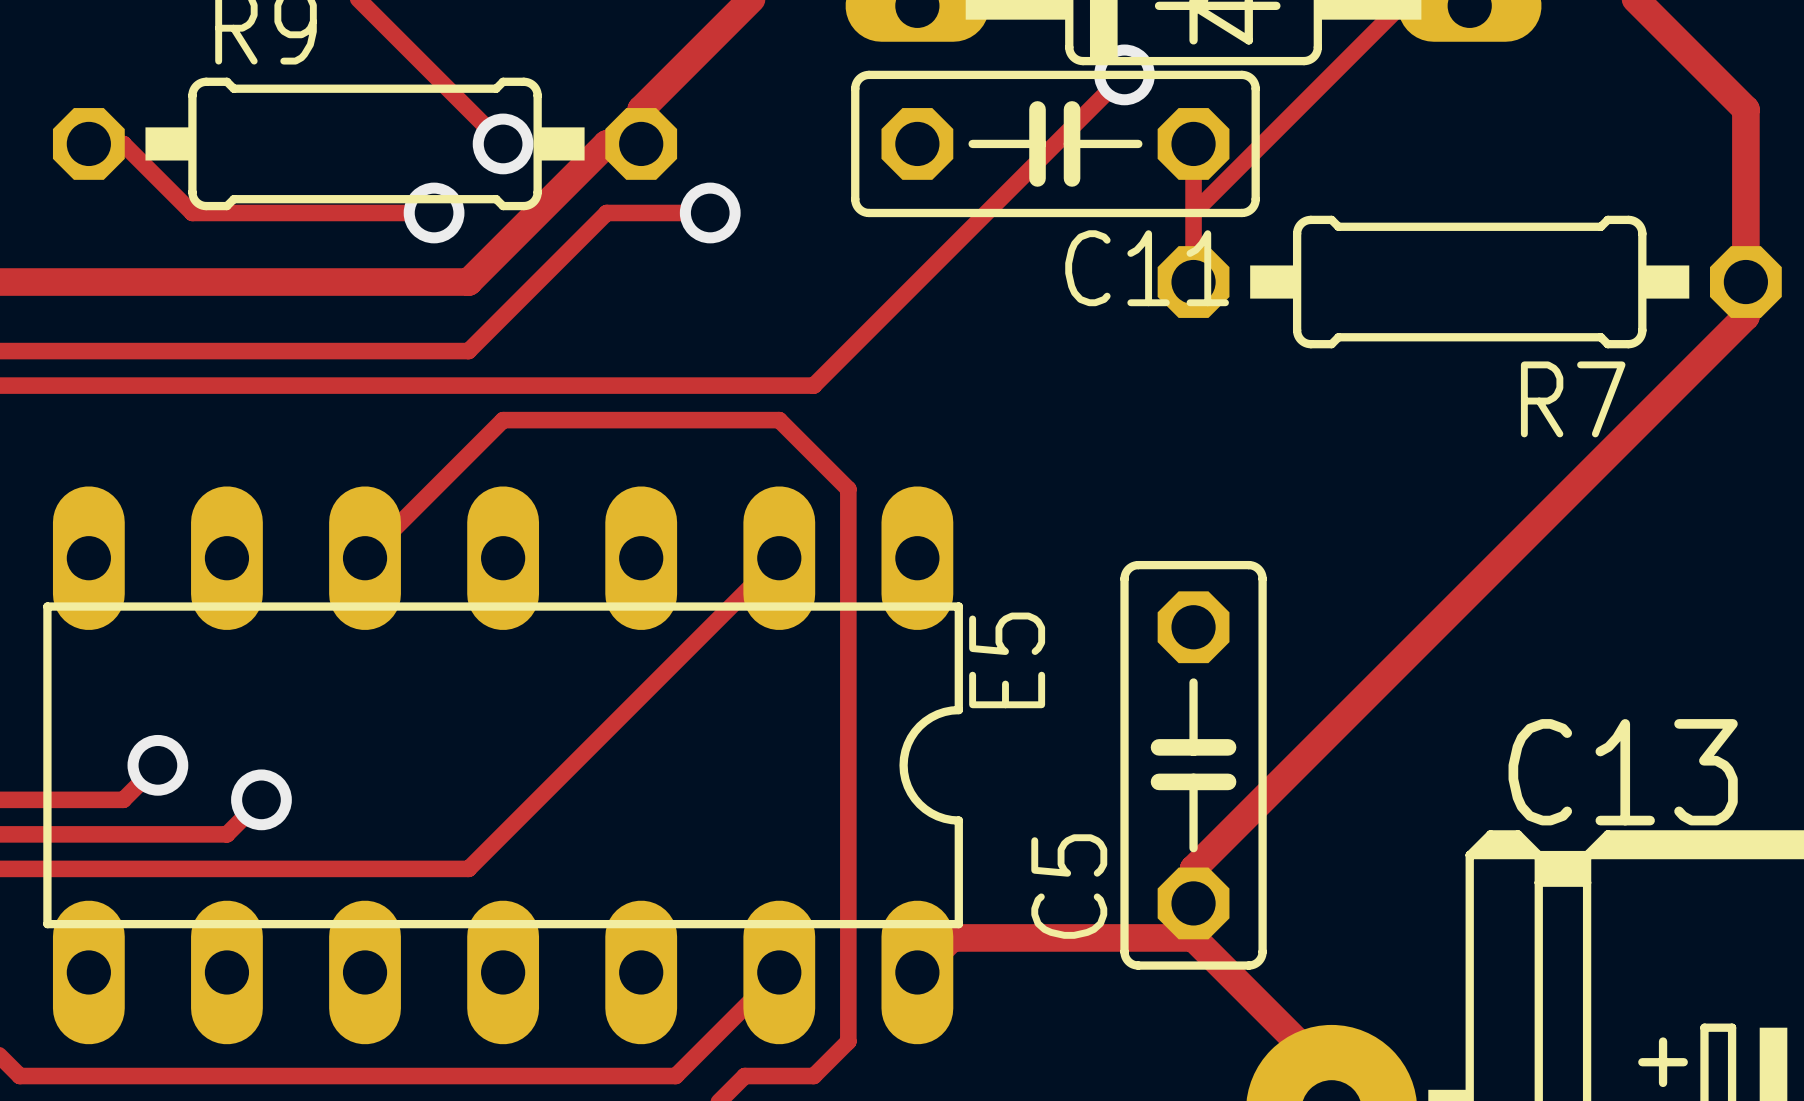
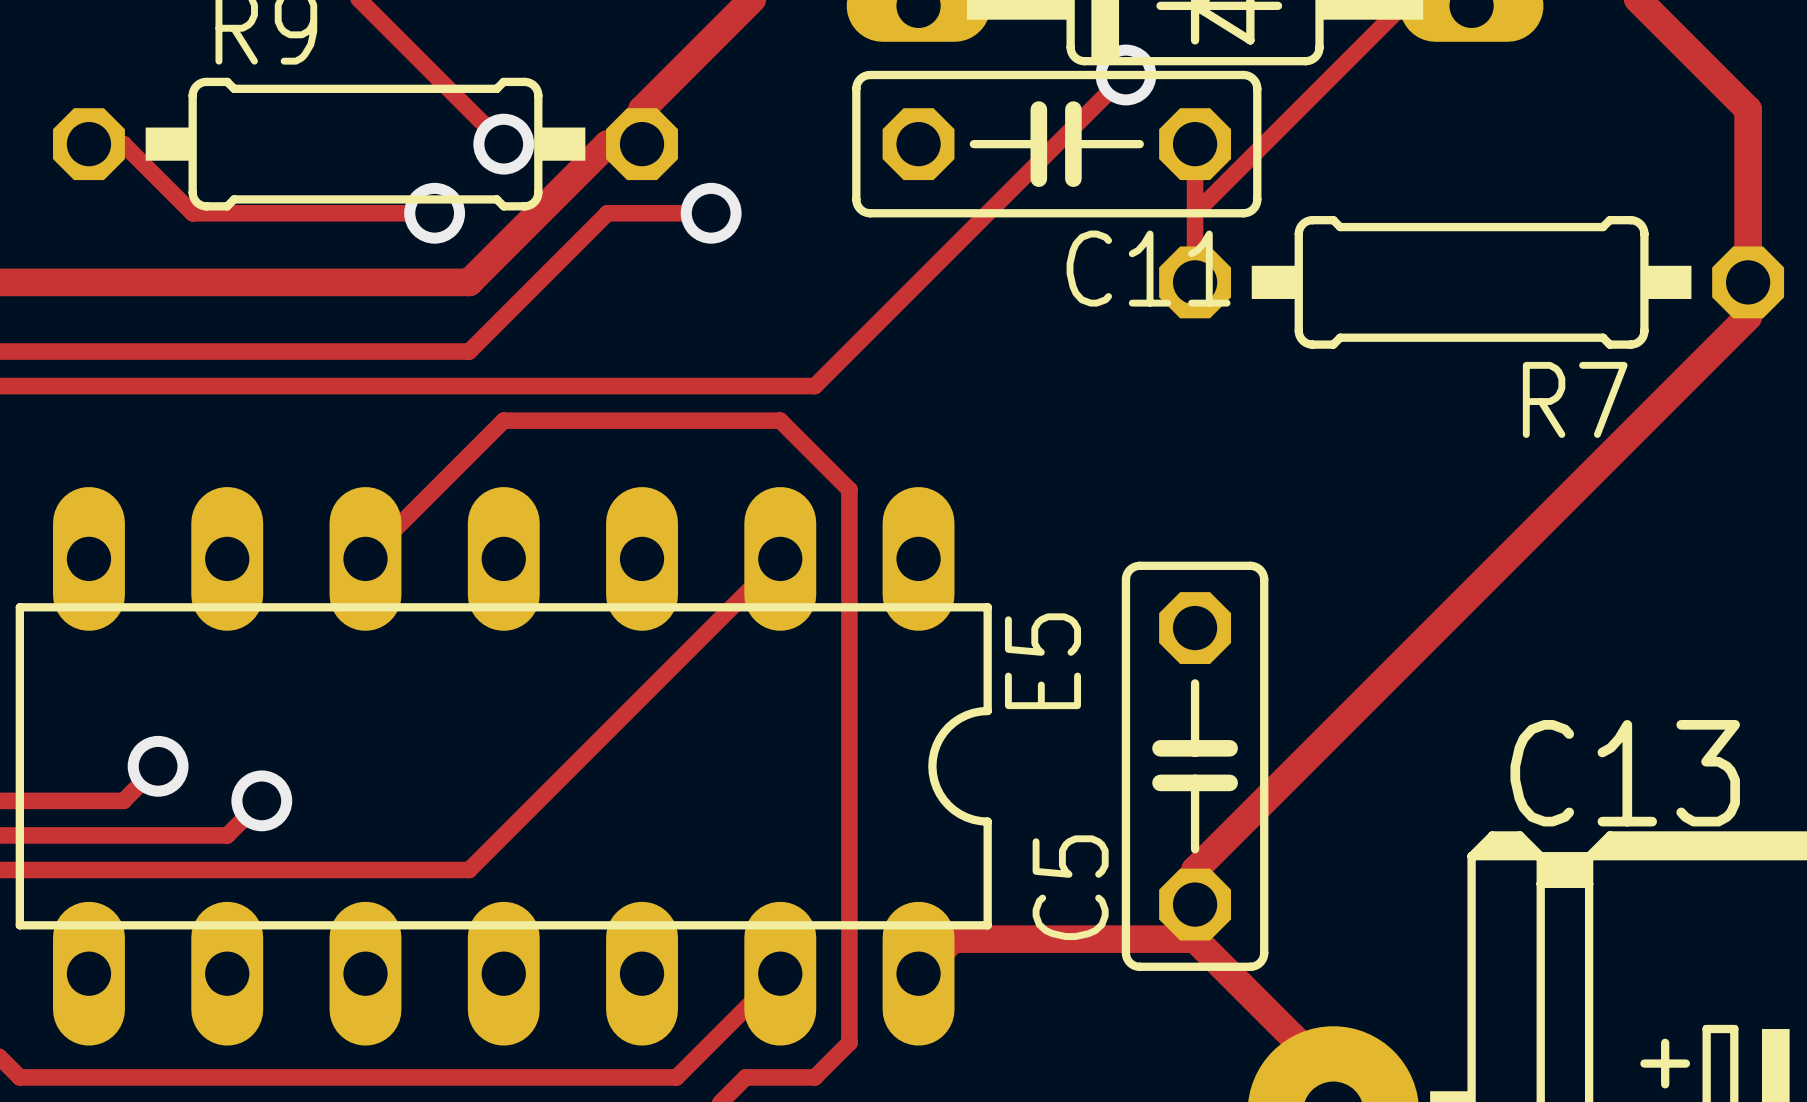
E5 footprint: [43, 486, 963, 1045] -> [15, 487, 992, 1046]
E5 name position: E5 (1007, 660) -> E5 (1042, 661)

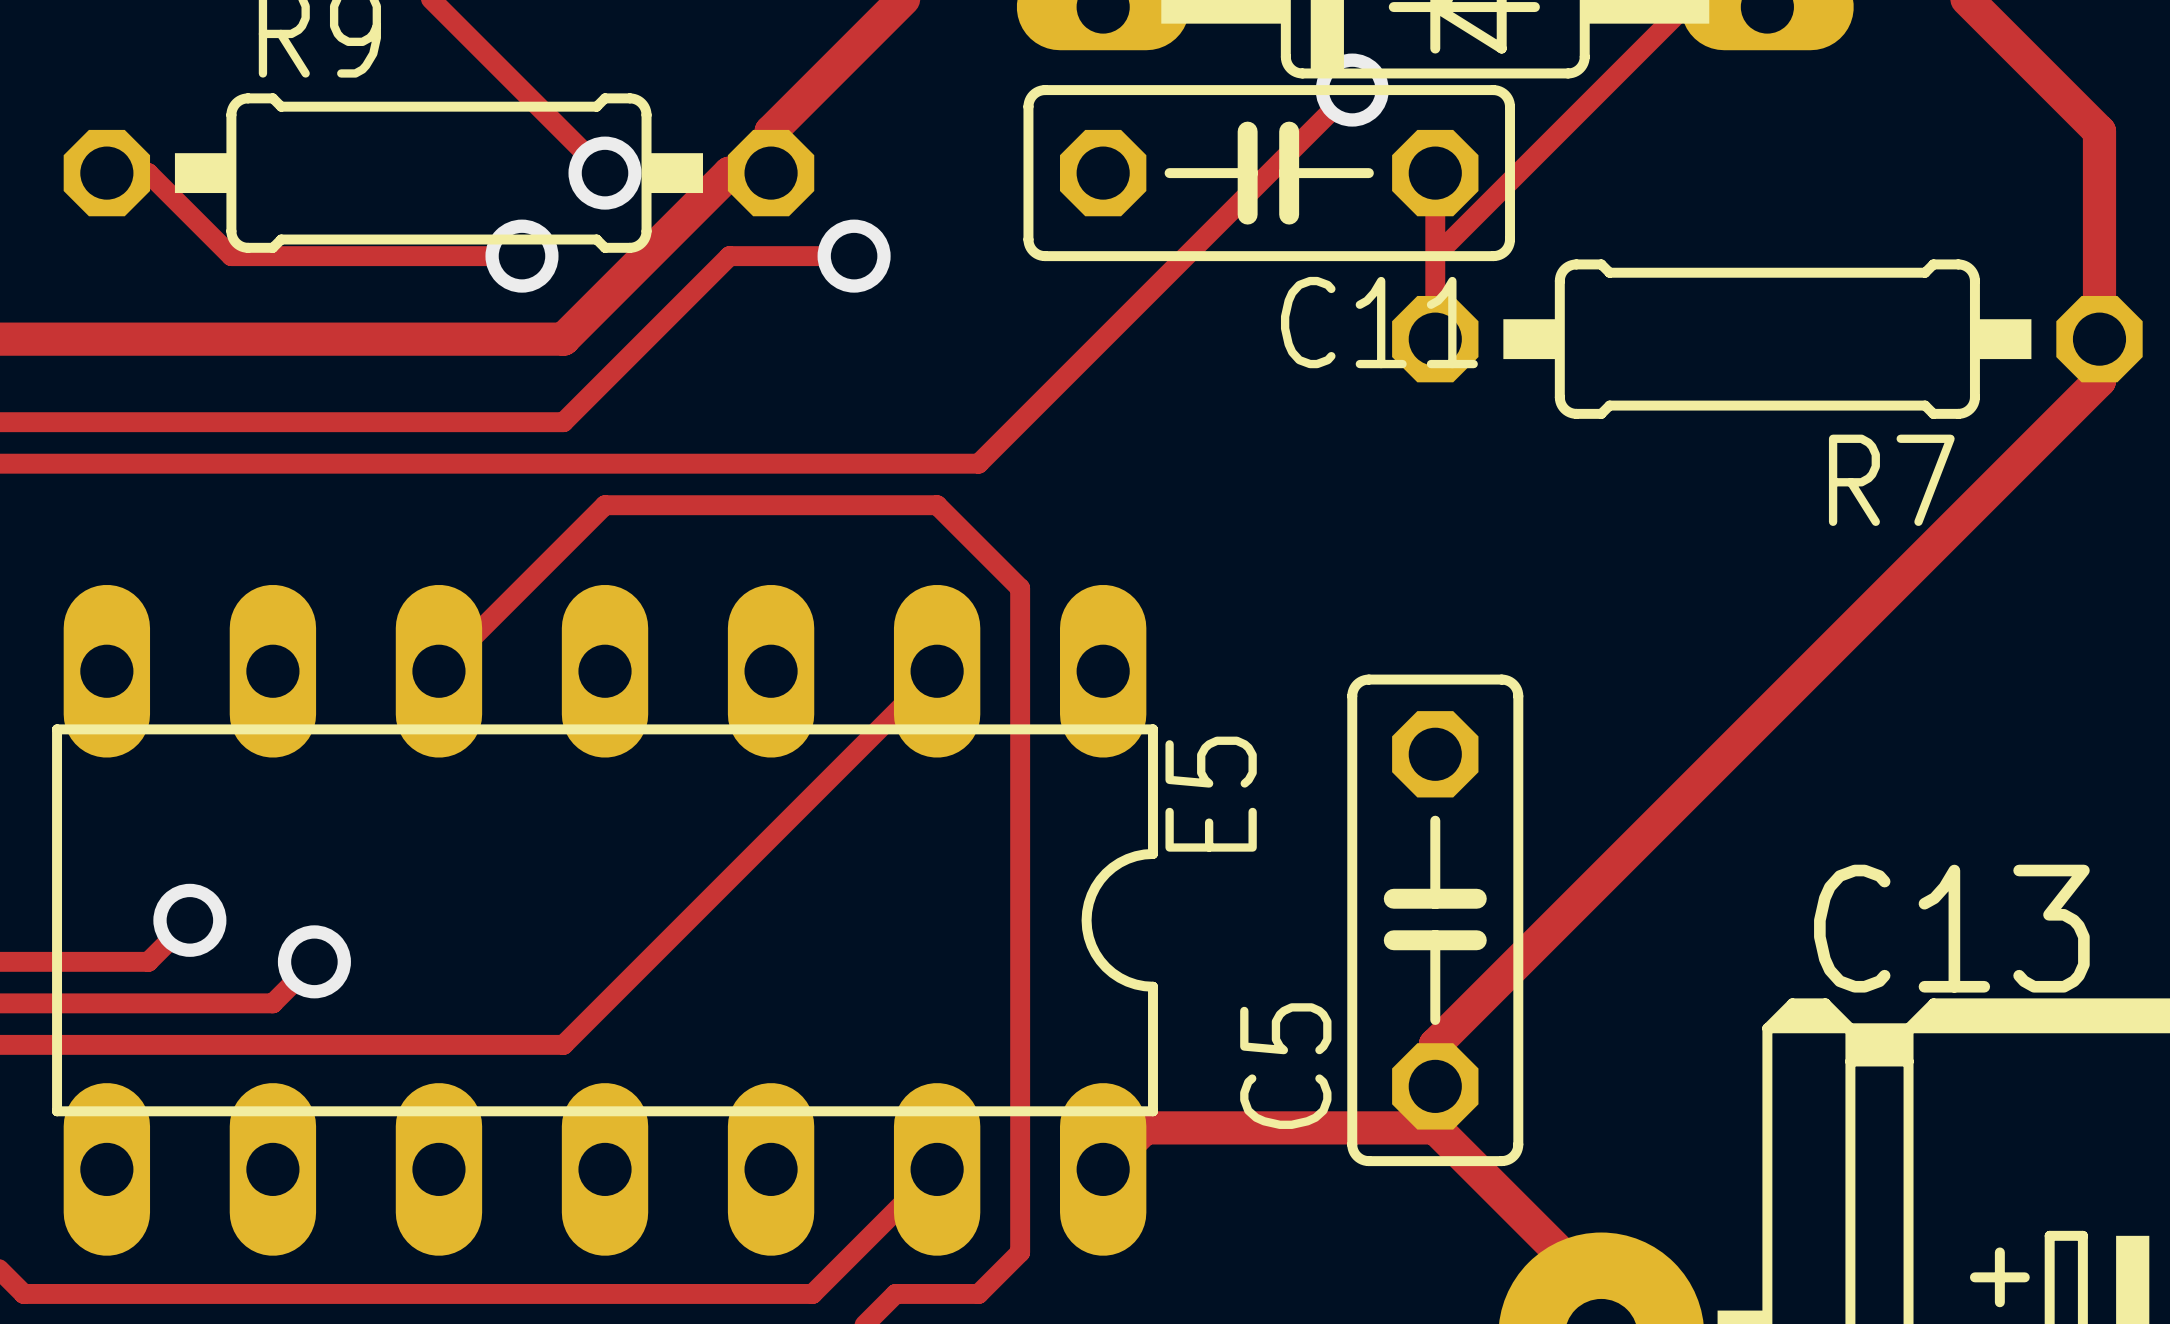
E5 footprint: [15, 487, 992, 1046] -> [52, 584, 1158, 1256]
E5 name position: E5 (1042, 661) -> E5 (1211, 794)

